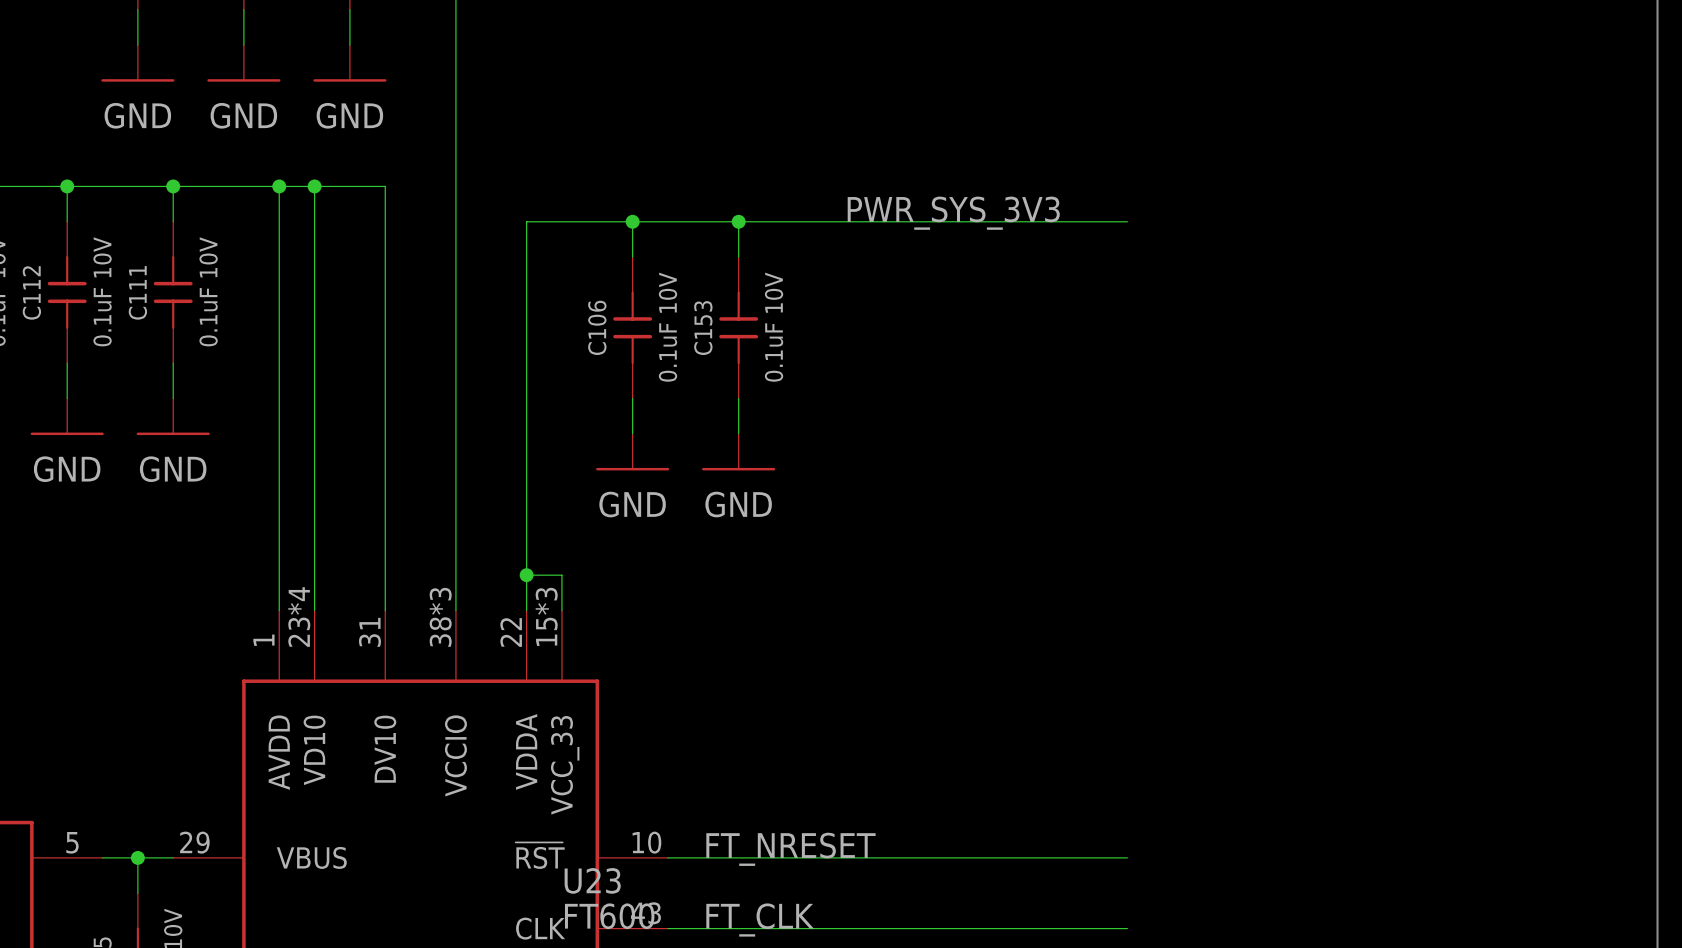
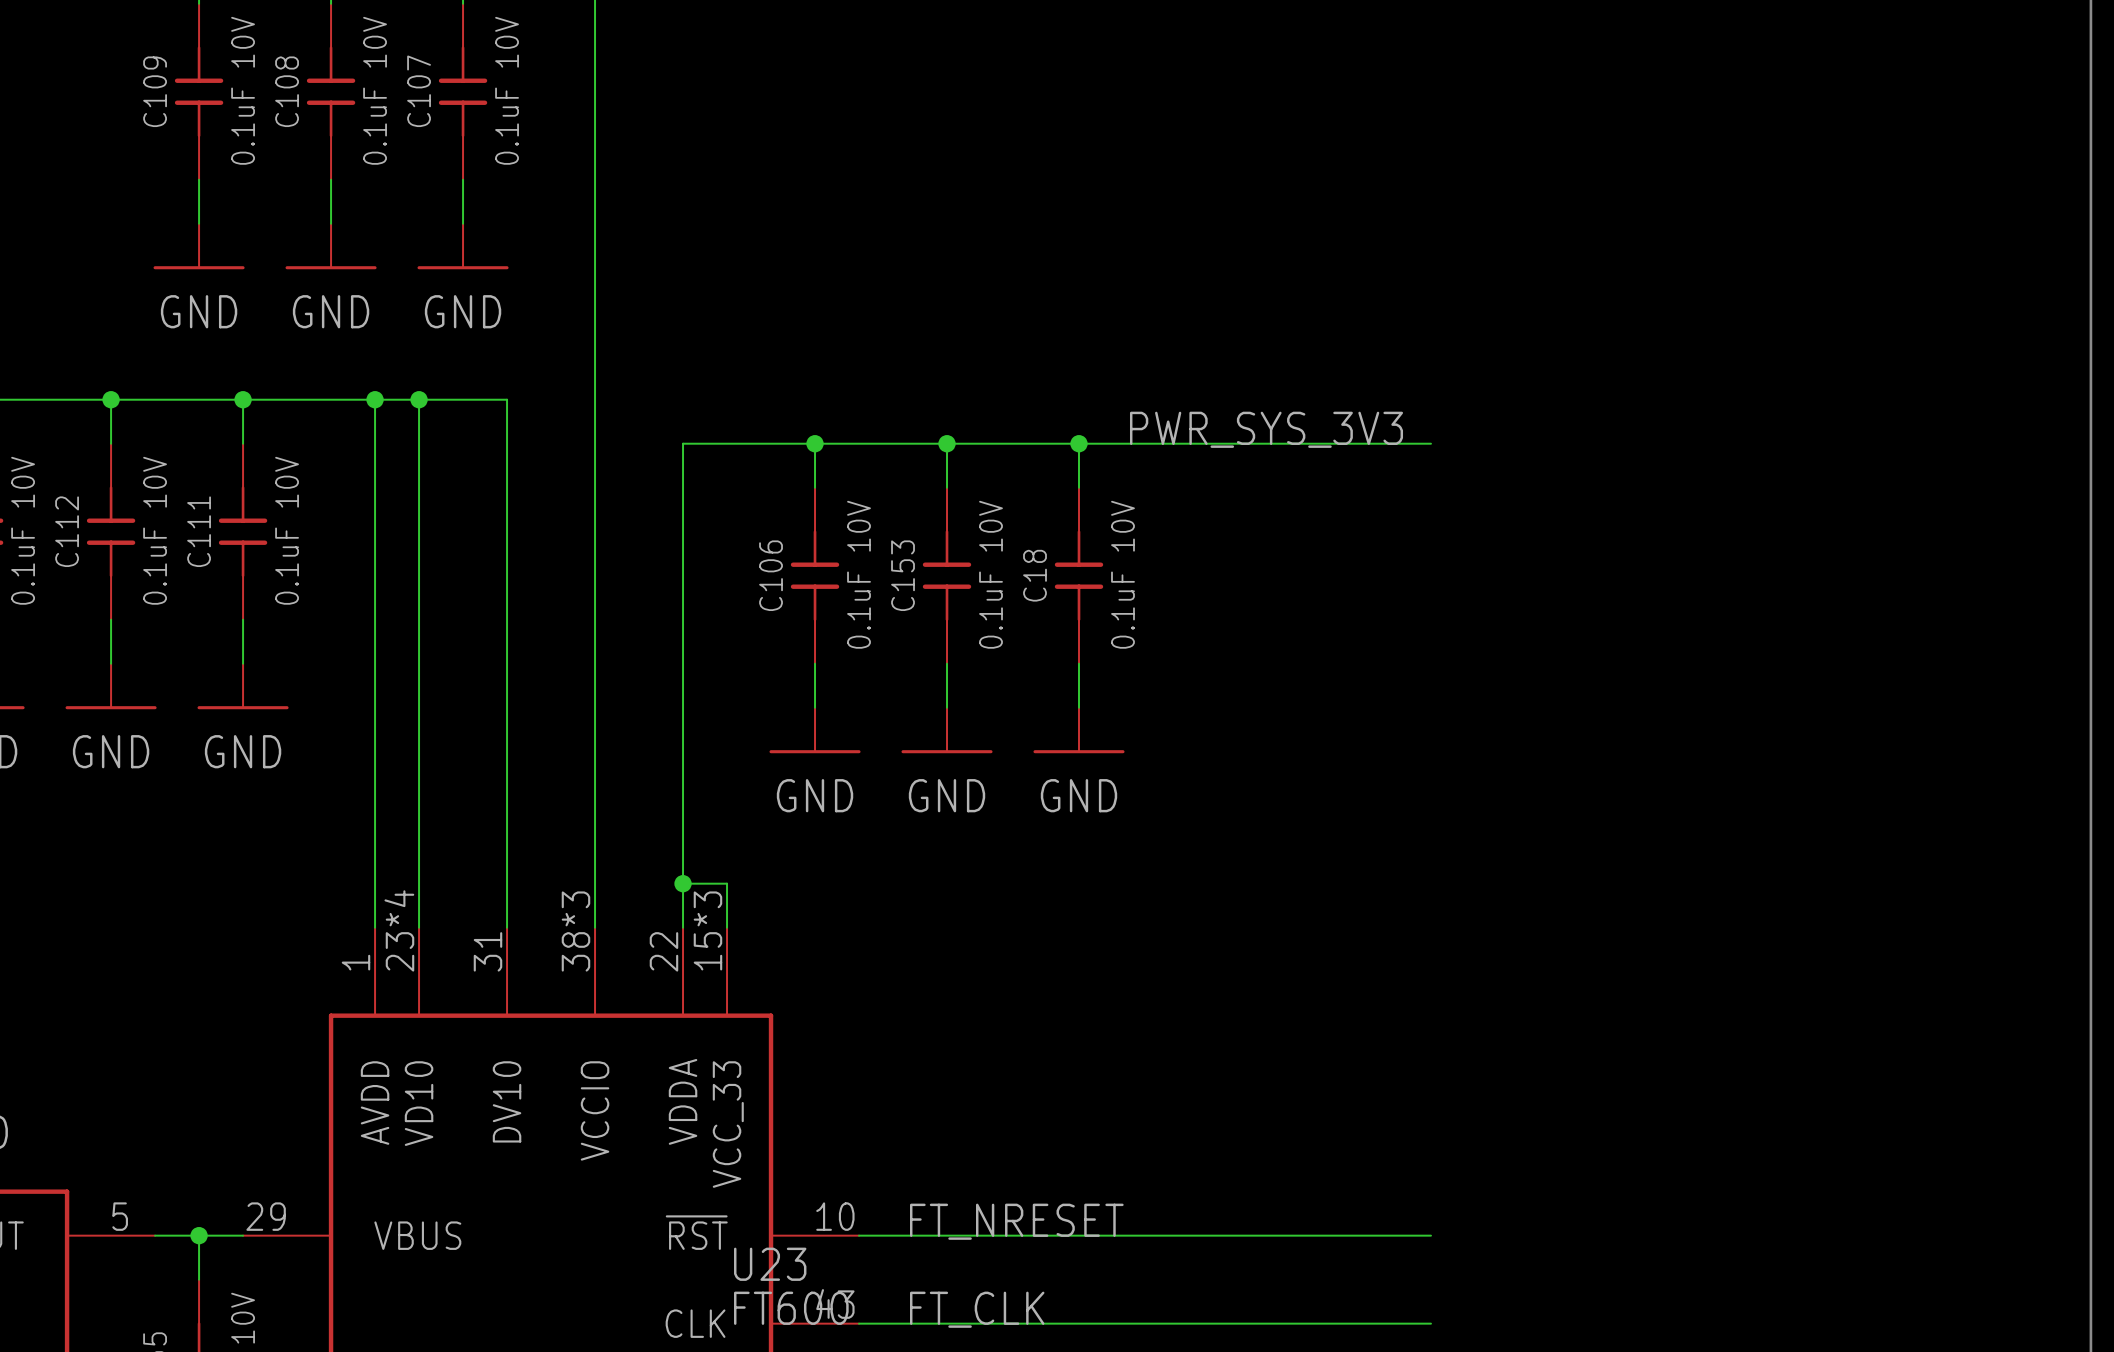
label position: PWR_SYS_3V3 (953, 213) -> PWR_SYS_3V3 (1266, 429)
wire: none -> (1079, 443) (1079, 487)
junction: none -> (1079, 443)
C18: none -> 0.1uF 10V (1079, 575)
wire: none -> (1079, 663) (1079, 707)
power symbol: none -> GND (1079, 730)

